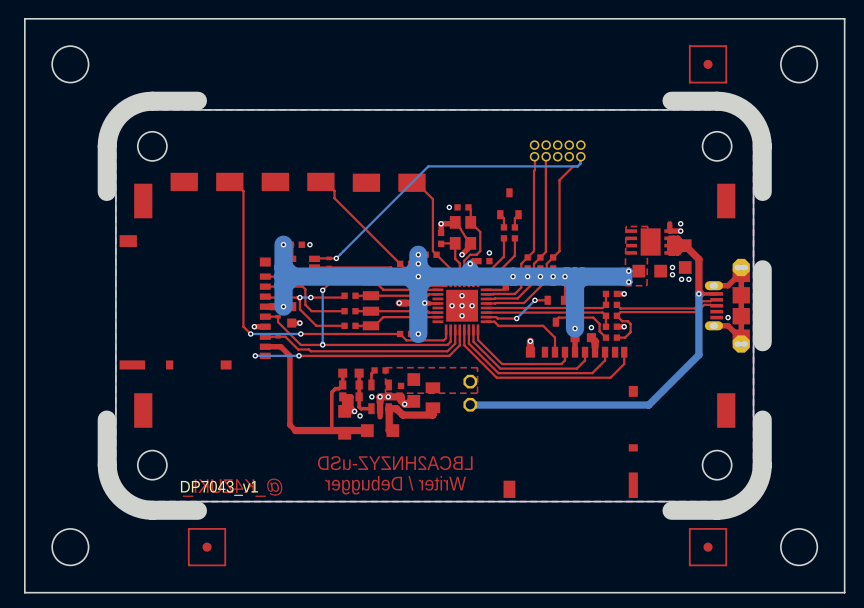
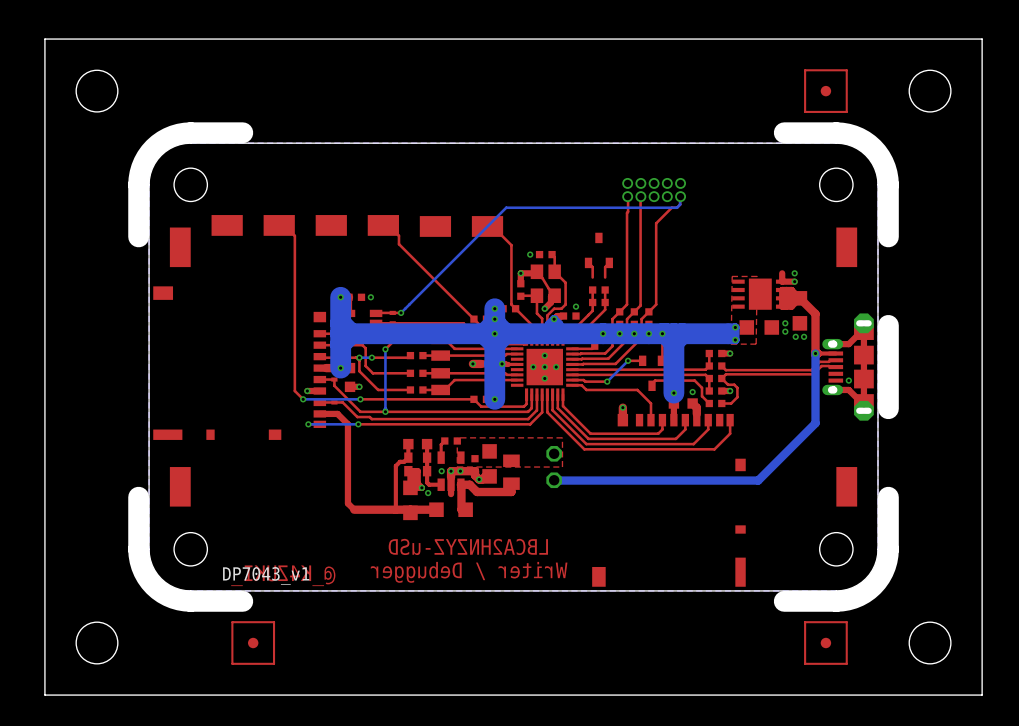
part: (503, 232) -> none
part: (514, 232) -> none
part: none -> (592, 296)
part: none -> (605, 296)

